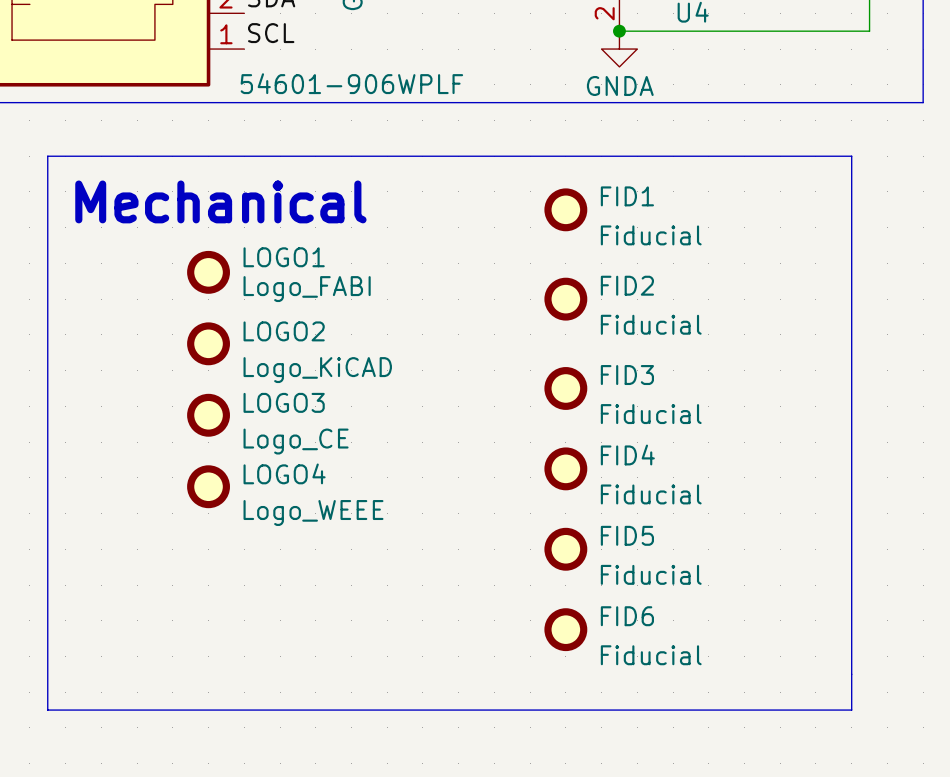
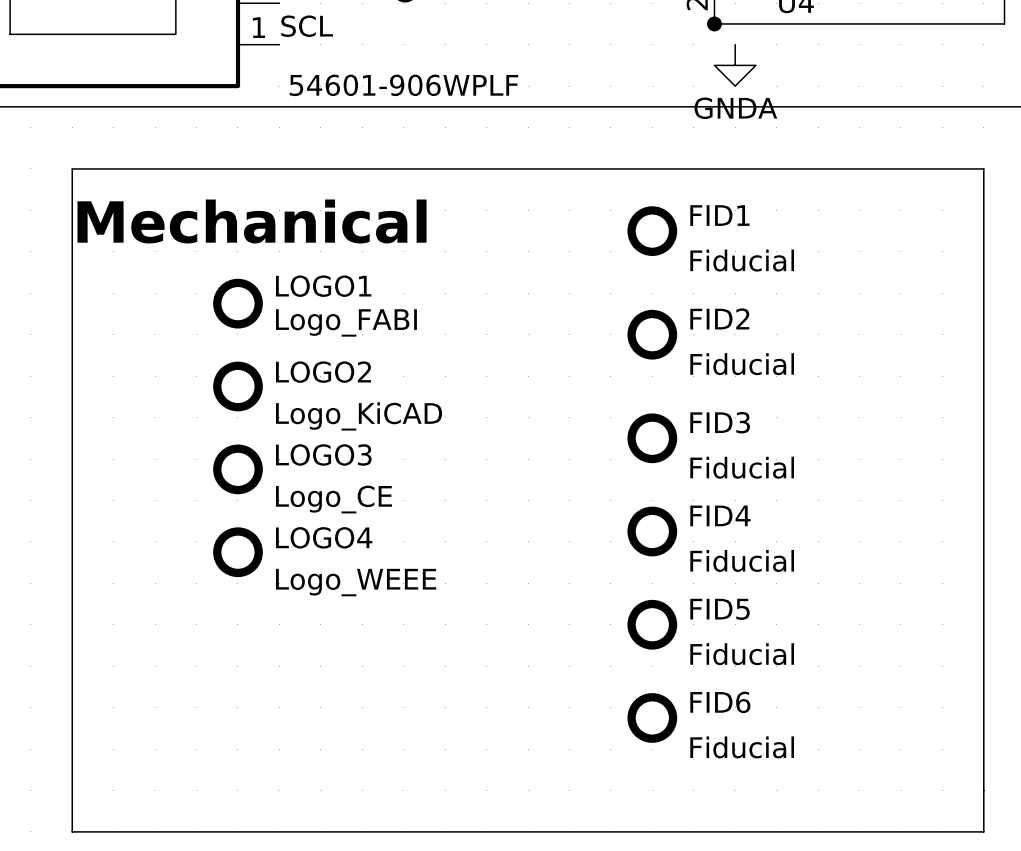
power symbol position: GNDA (619, 49) -> GNDA (735, 65)
line: (65, 156) (47, 156) (47, 710) (851, 710) -> (72, 168) (72, 831) (983, 831) (983, 811)

